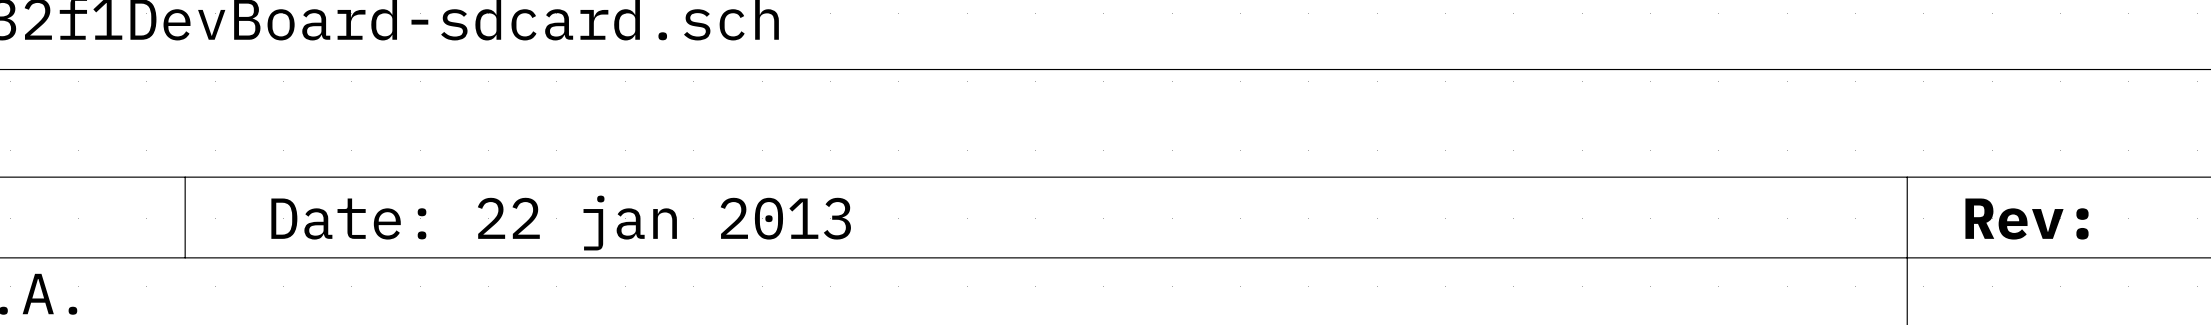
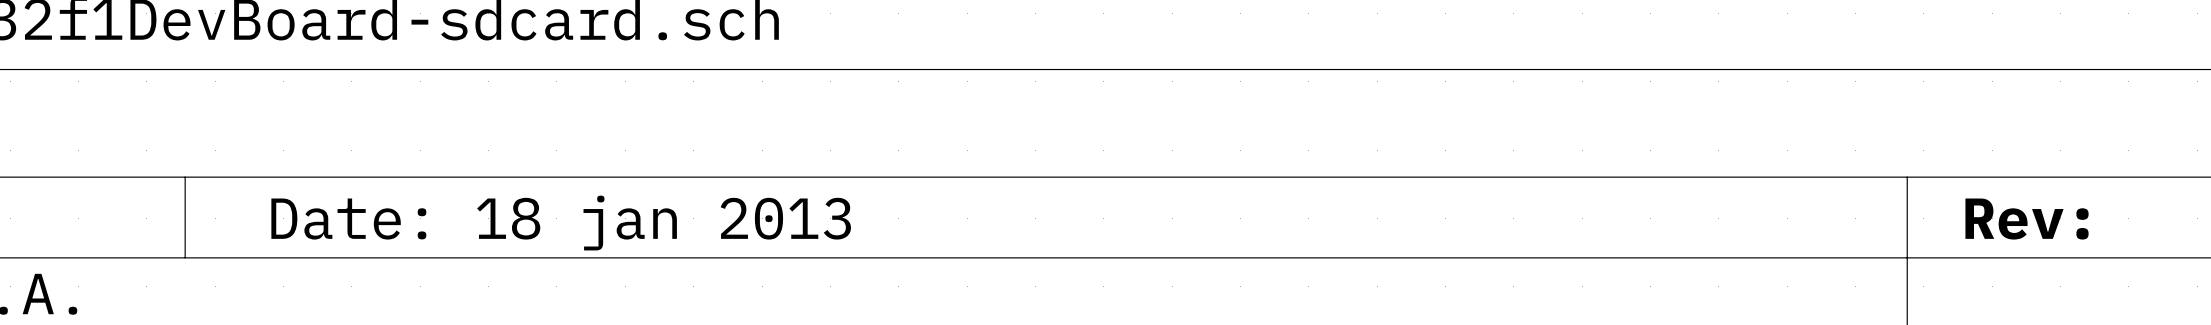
title block: Date: 22 jan 2013 (561, 223) -> Date: 18 jan 2013 (561, 223)

